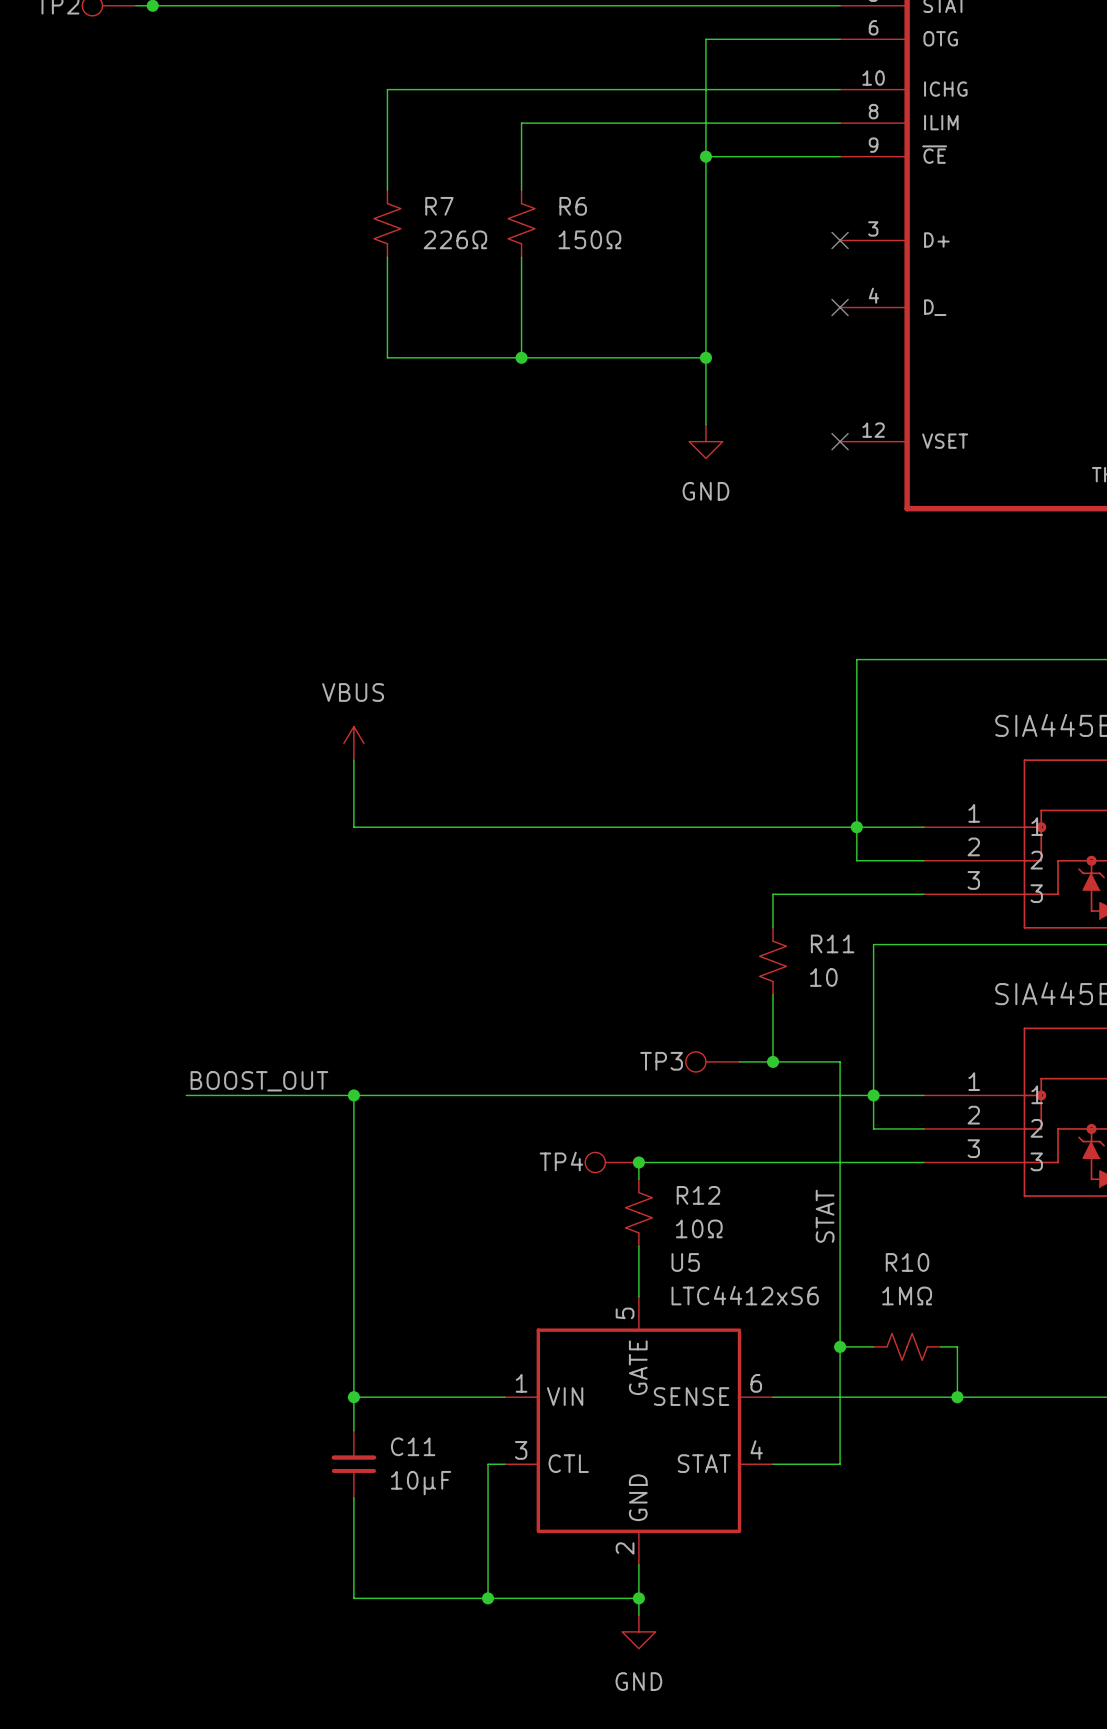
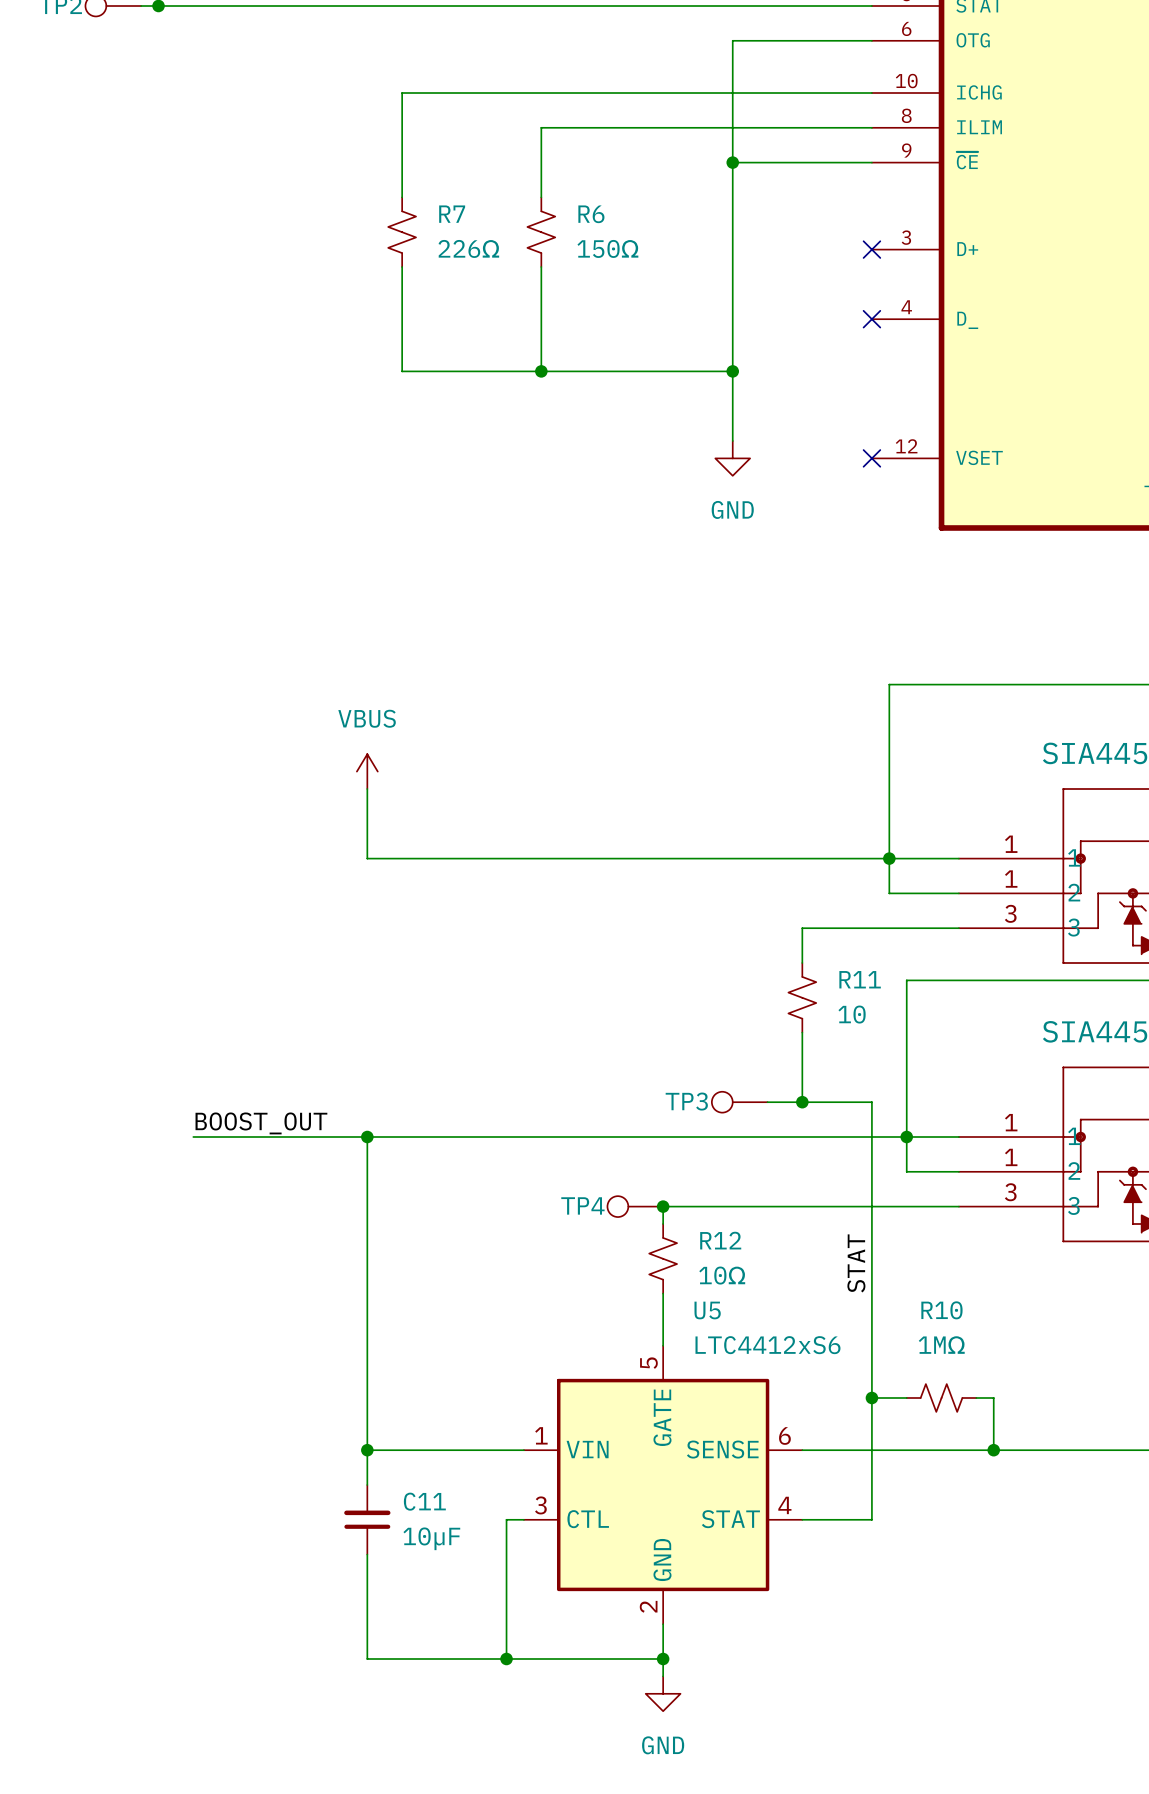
part pin number: 2 (973, 846) -> 1 (1011, 879)
part pin number: 2 (973, 1115) -> 1 (1011, 1157)

